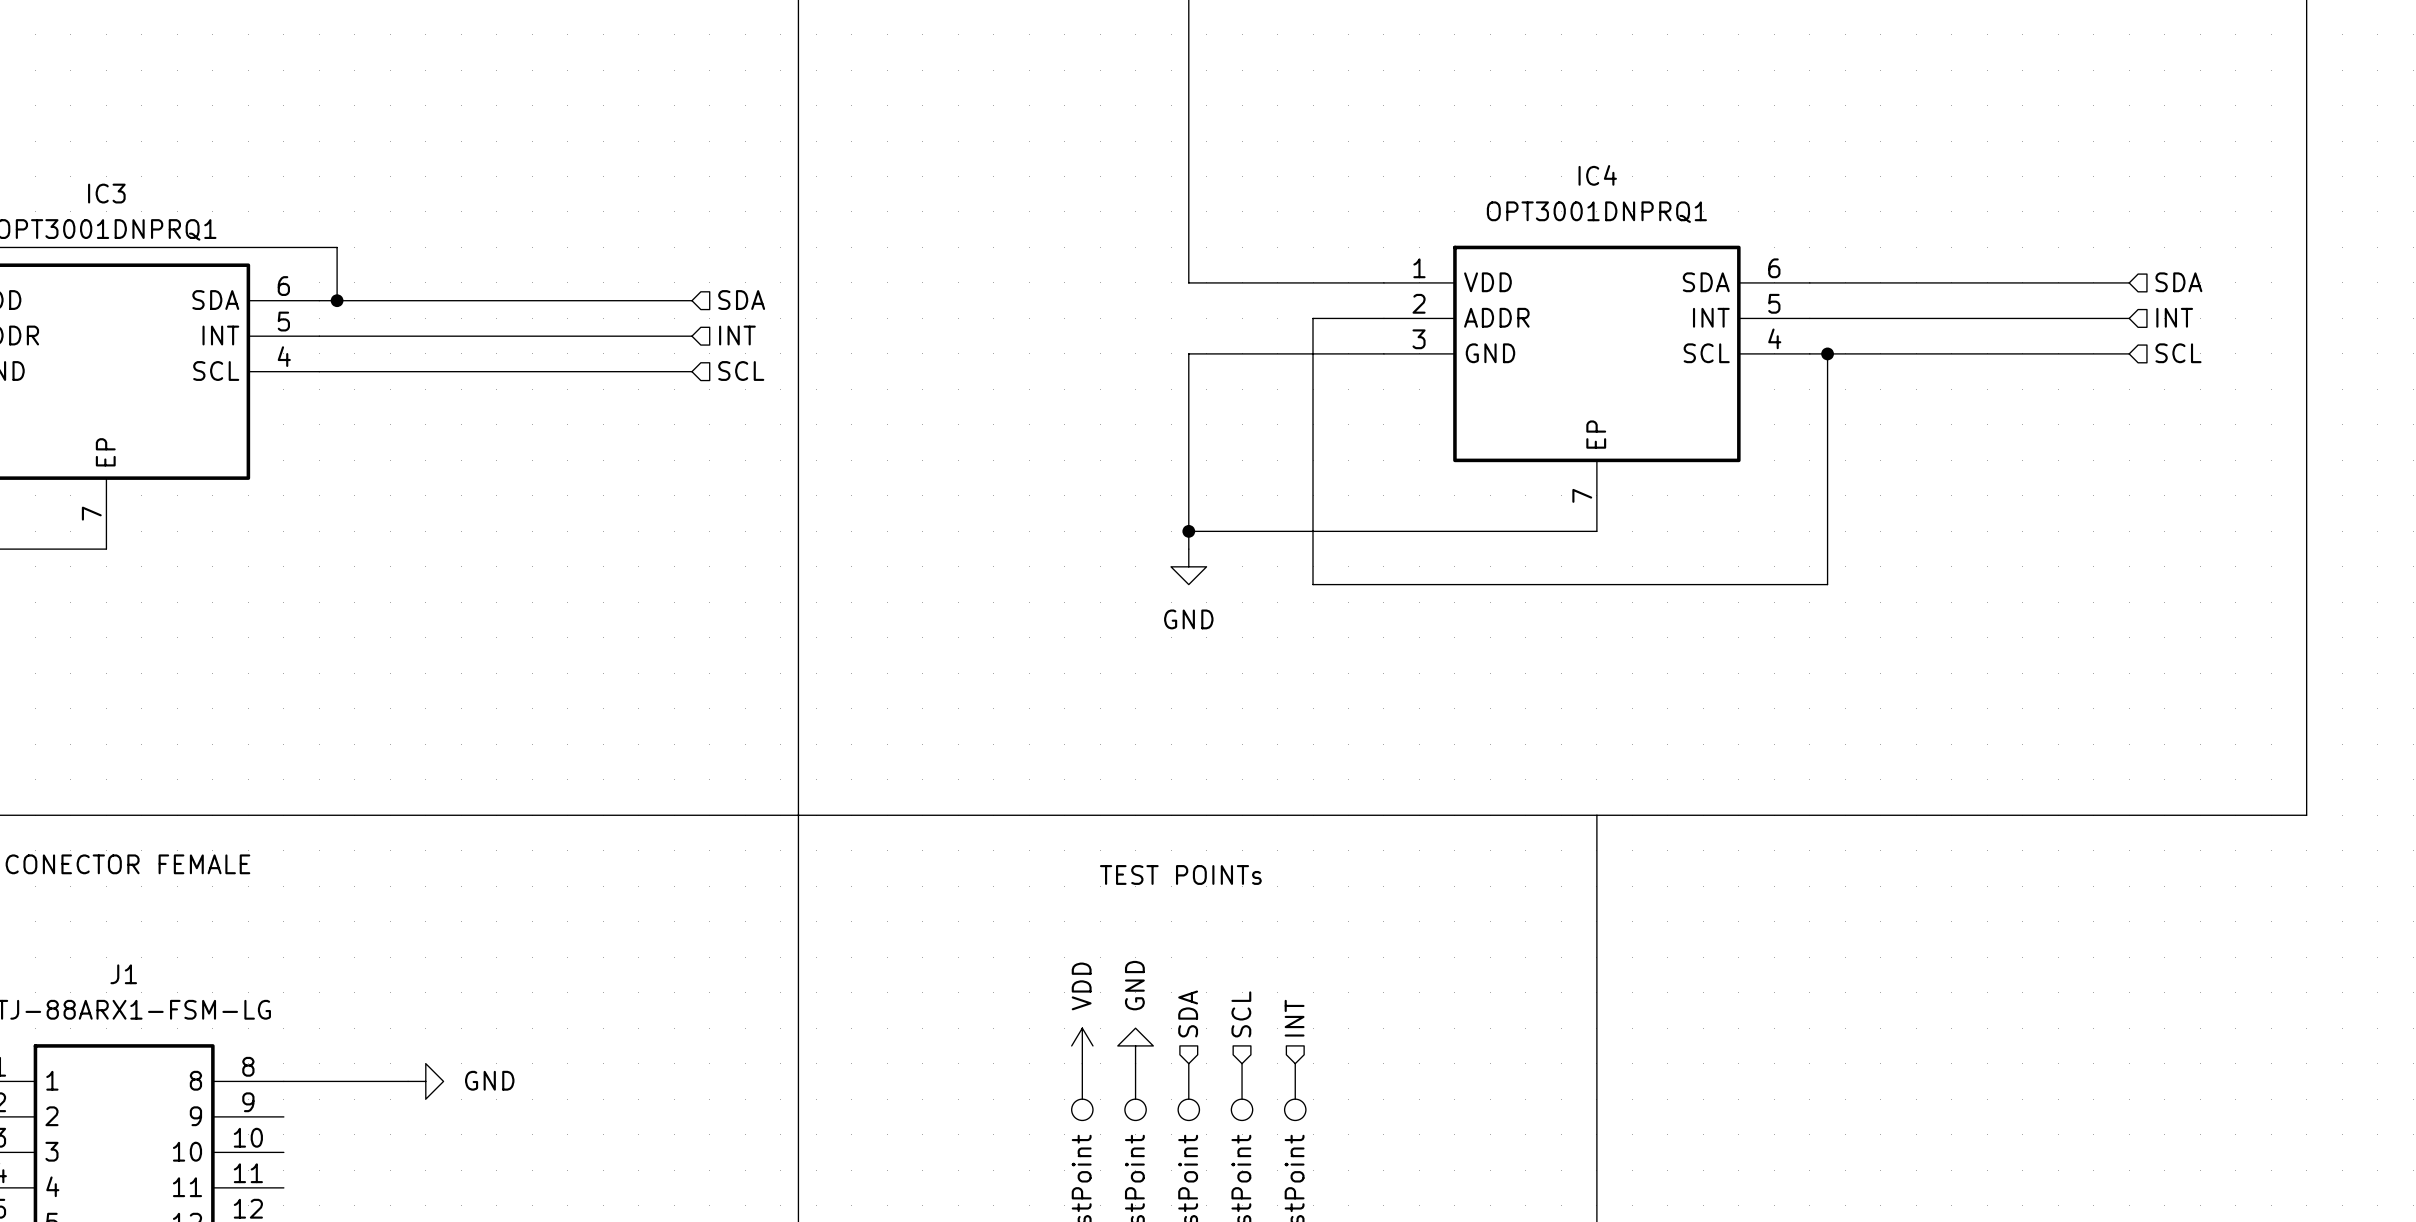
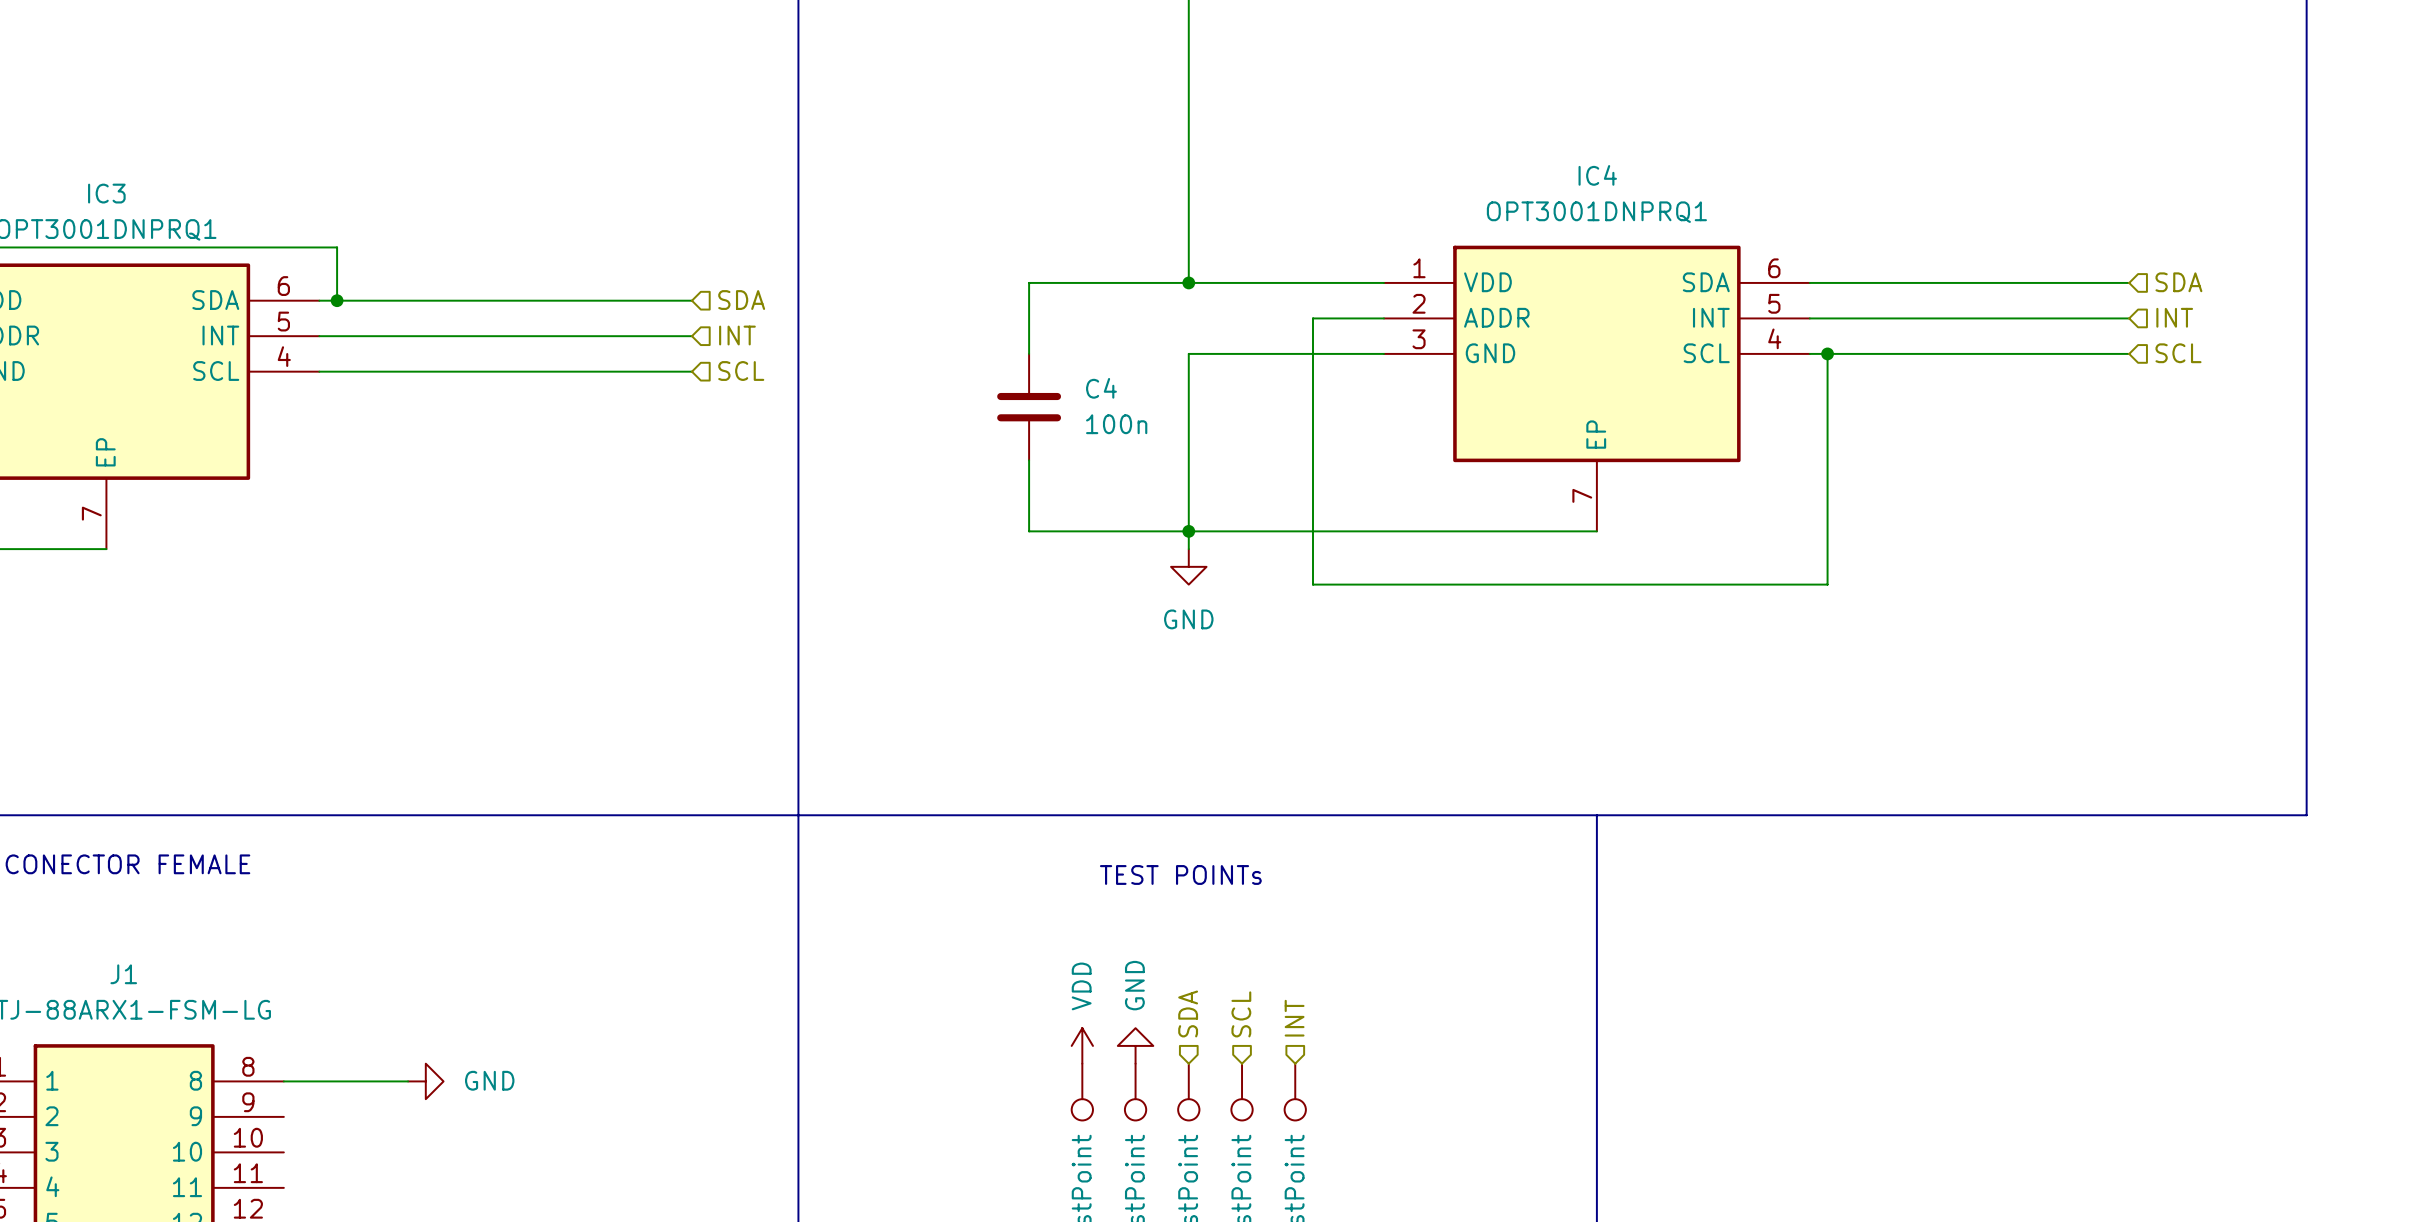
wire: none -> (1188, 282) (1029, 282) (1029, 353)
junction: none -> (1188, 282)
C4: none -> 100n (1029, 407)
wire: none -> (1029, 460) (1029, 531) (1188, 531)

